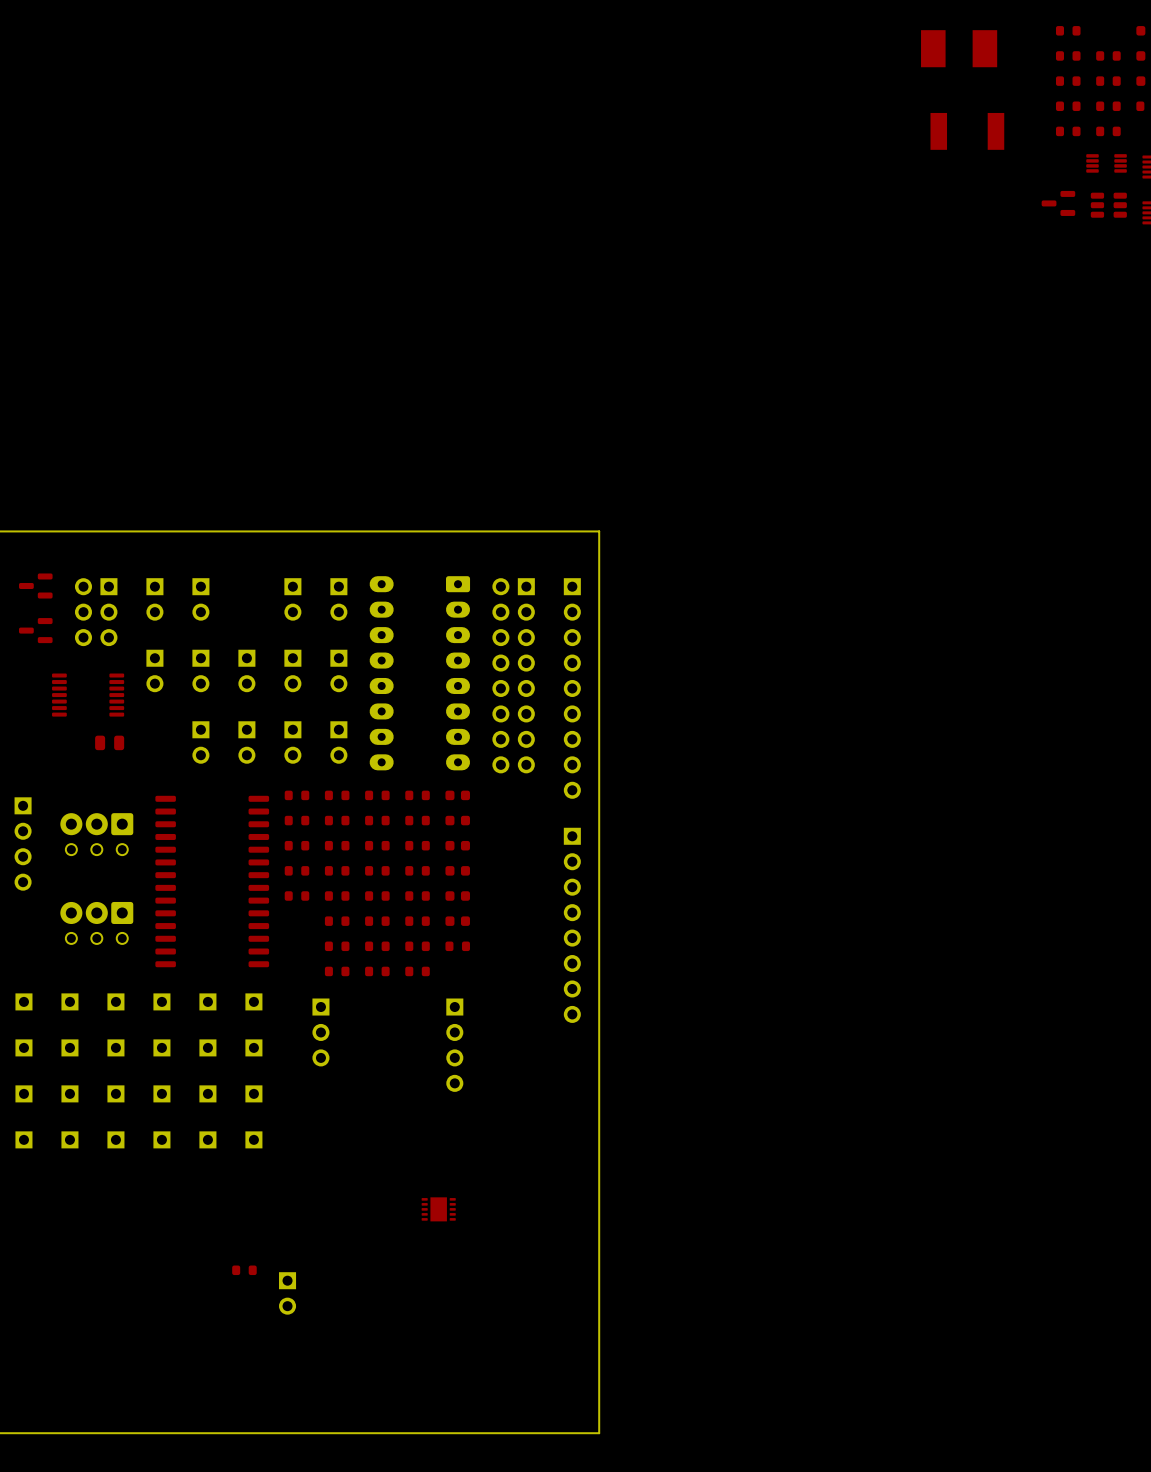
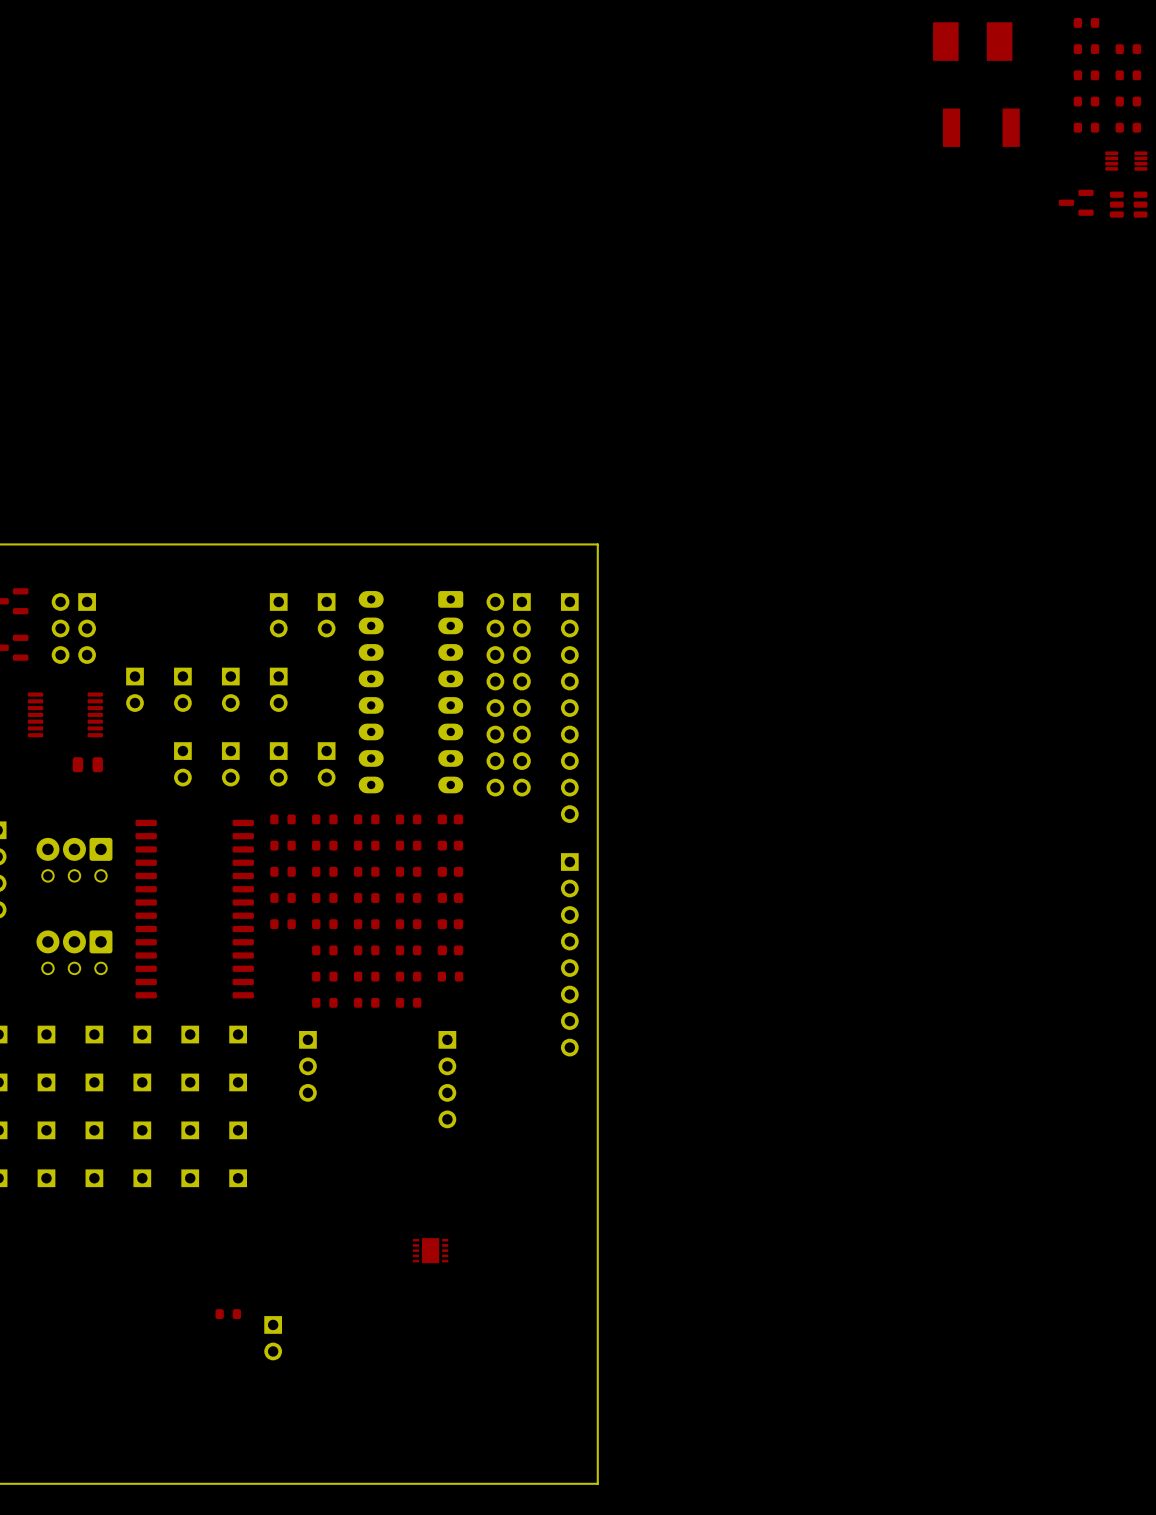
part: (154, 599) -> none
part: (200, 599) -> none
part: (338, 670) -> none

